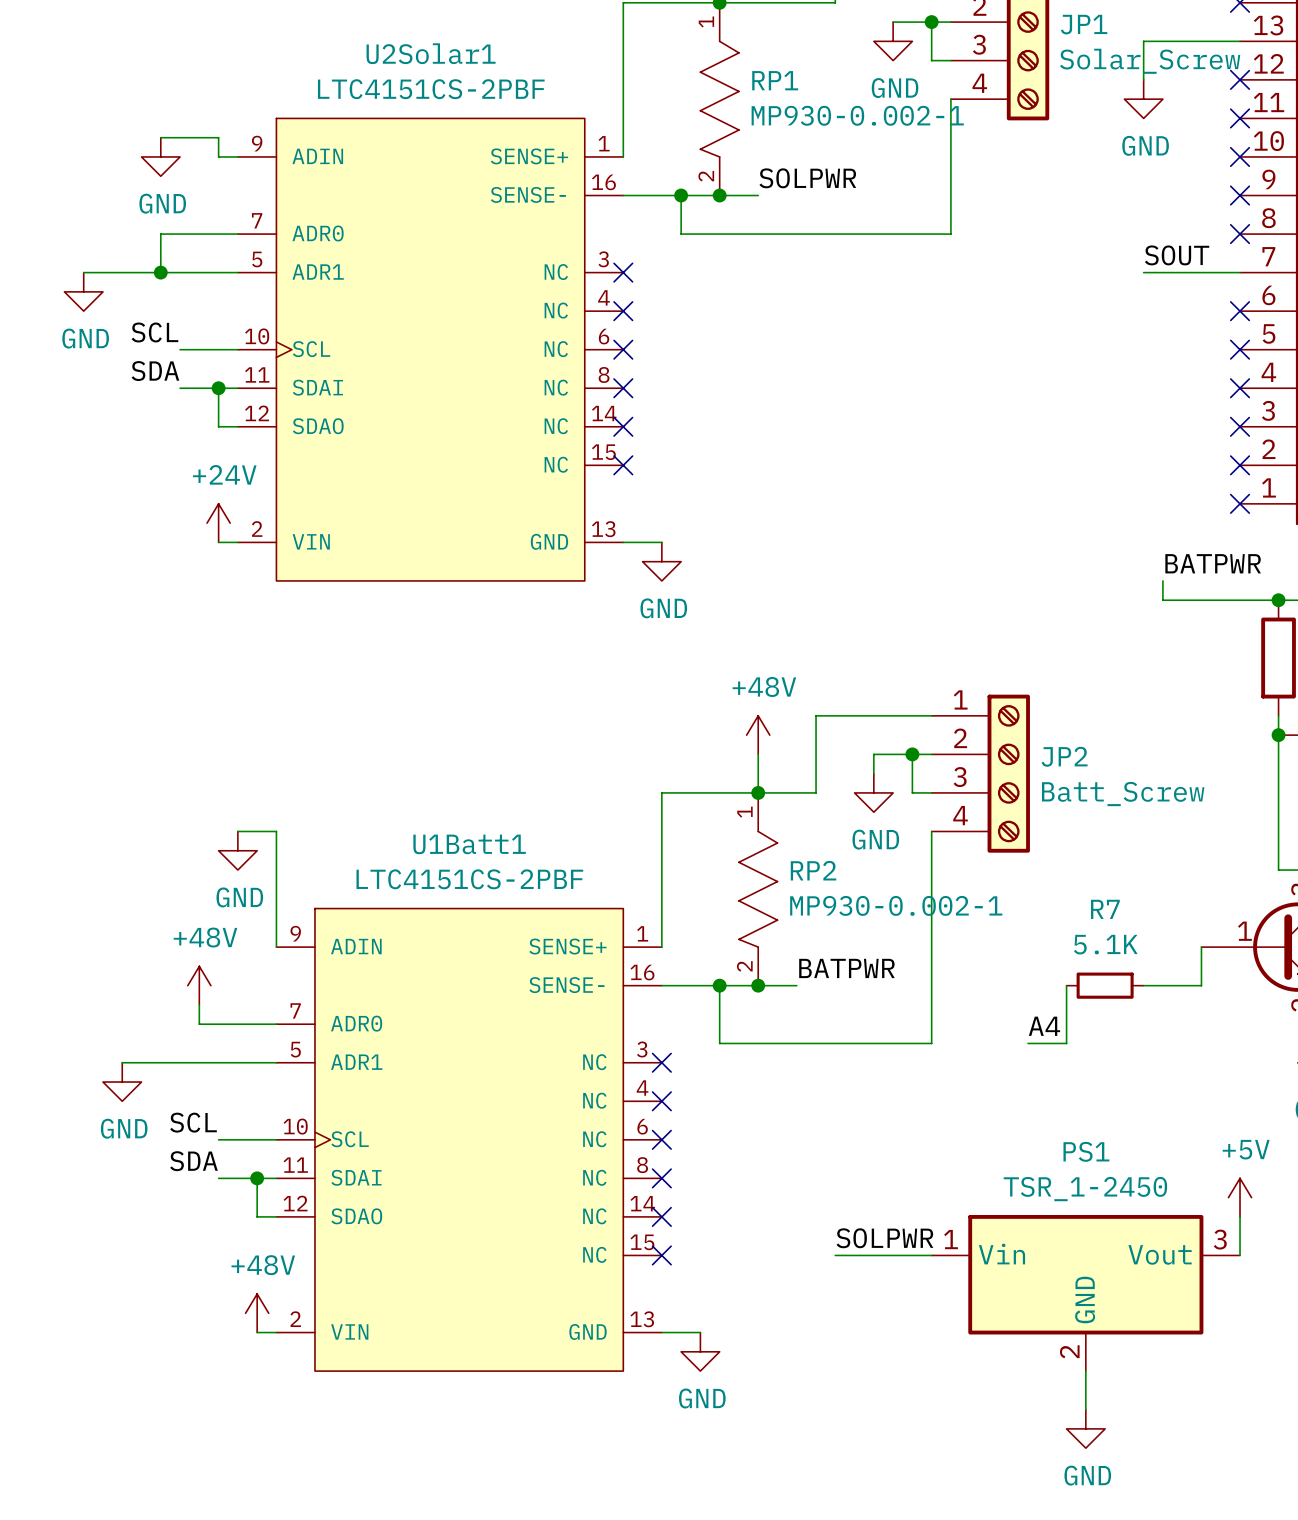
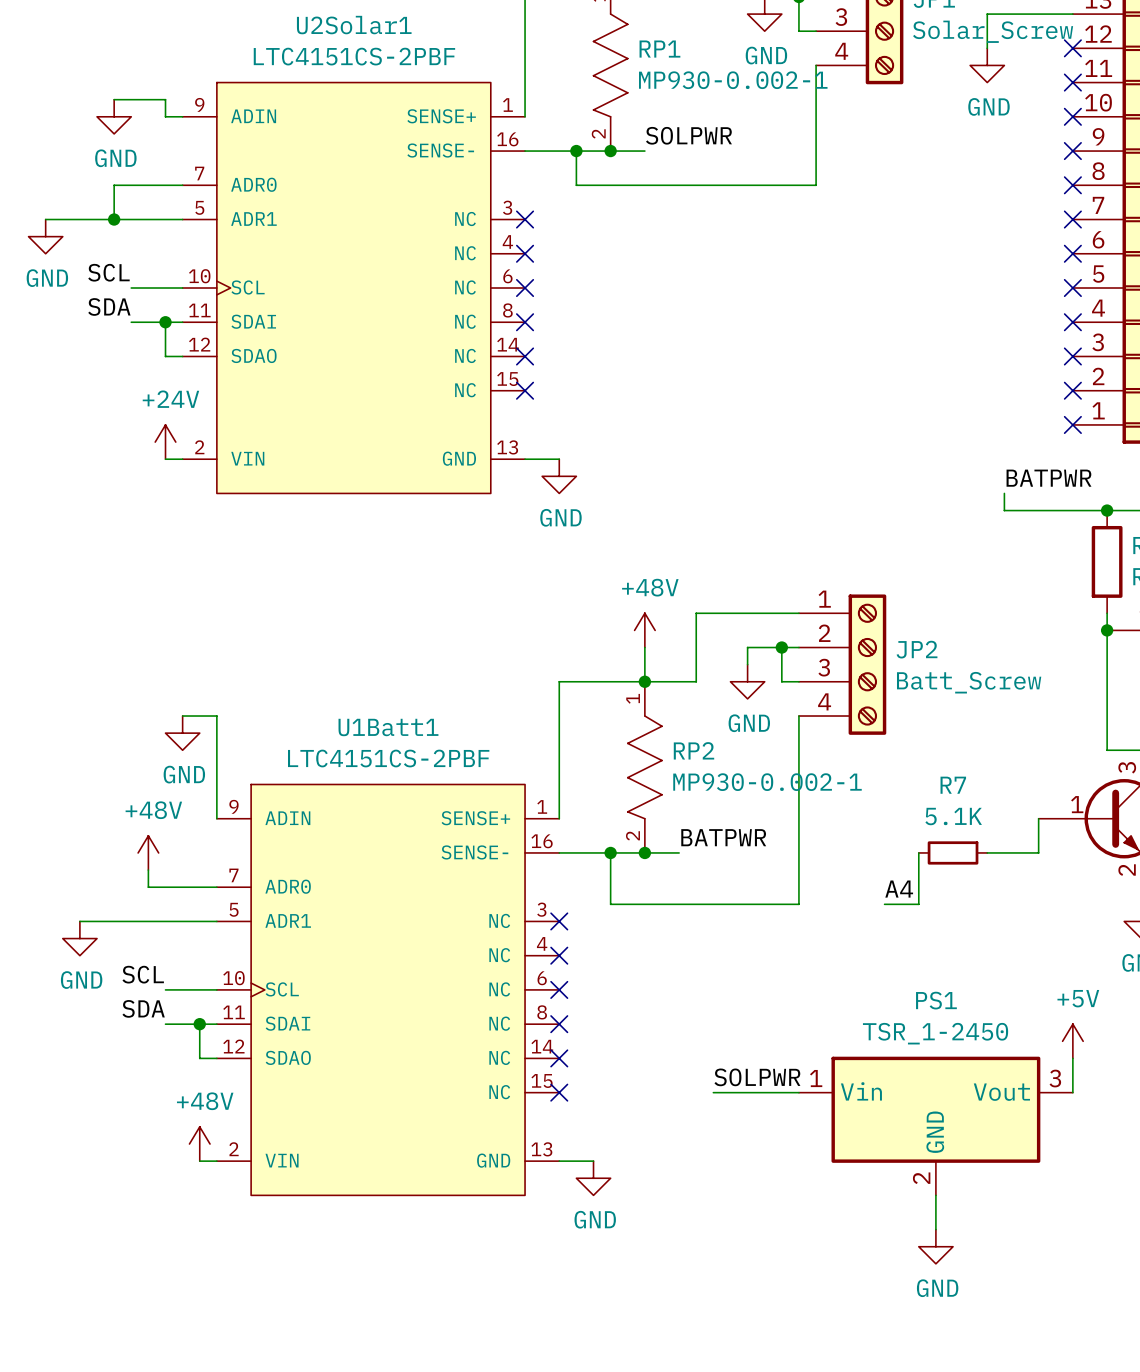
label: SOUT (1177, 255) -> none
wire: (1143, 272) (1240, 272) -> none
no-connect mark: none -> (1072, 219)

